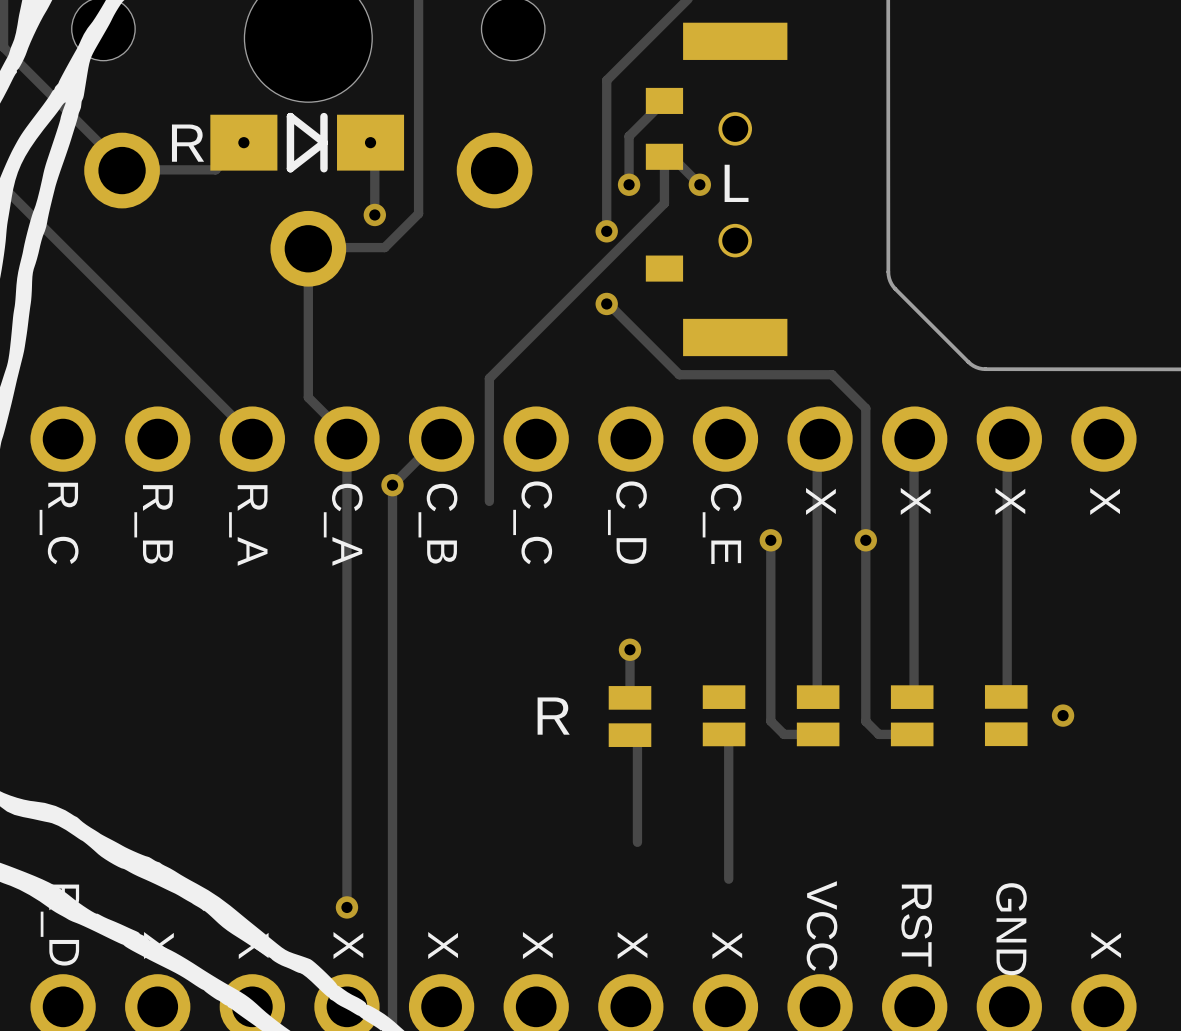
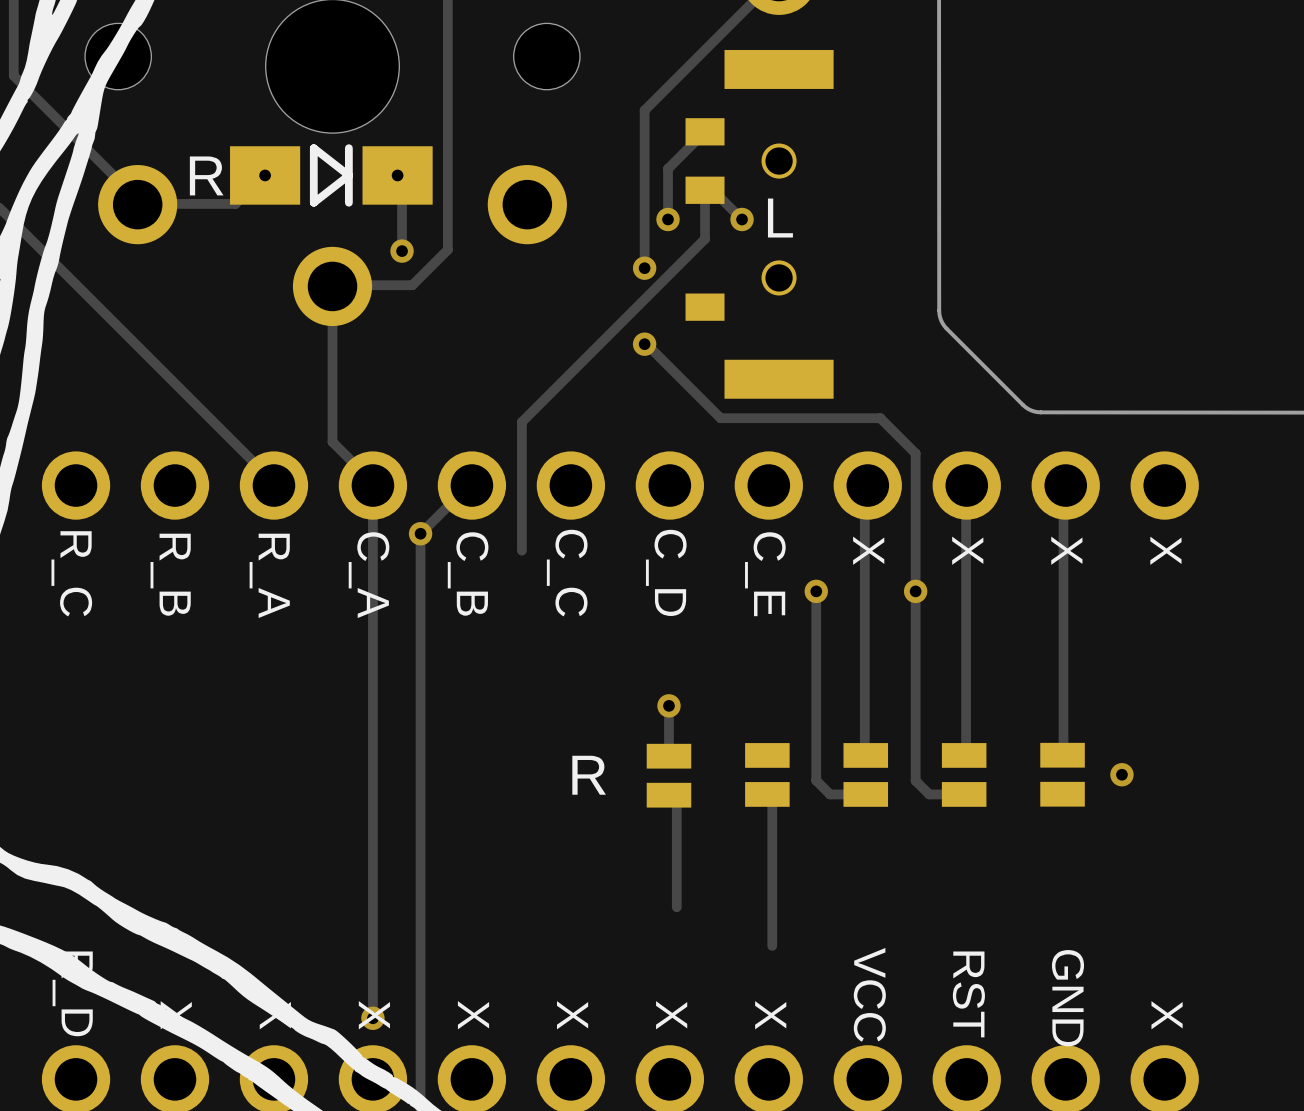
track: none -> (372, 975) (372, 1018)
via position: (346, 907) -> (372, 1018)

